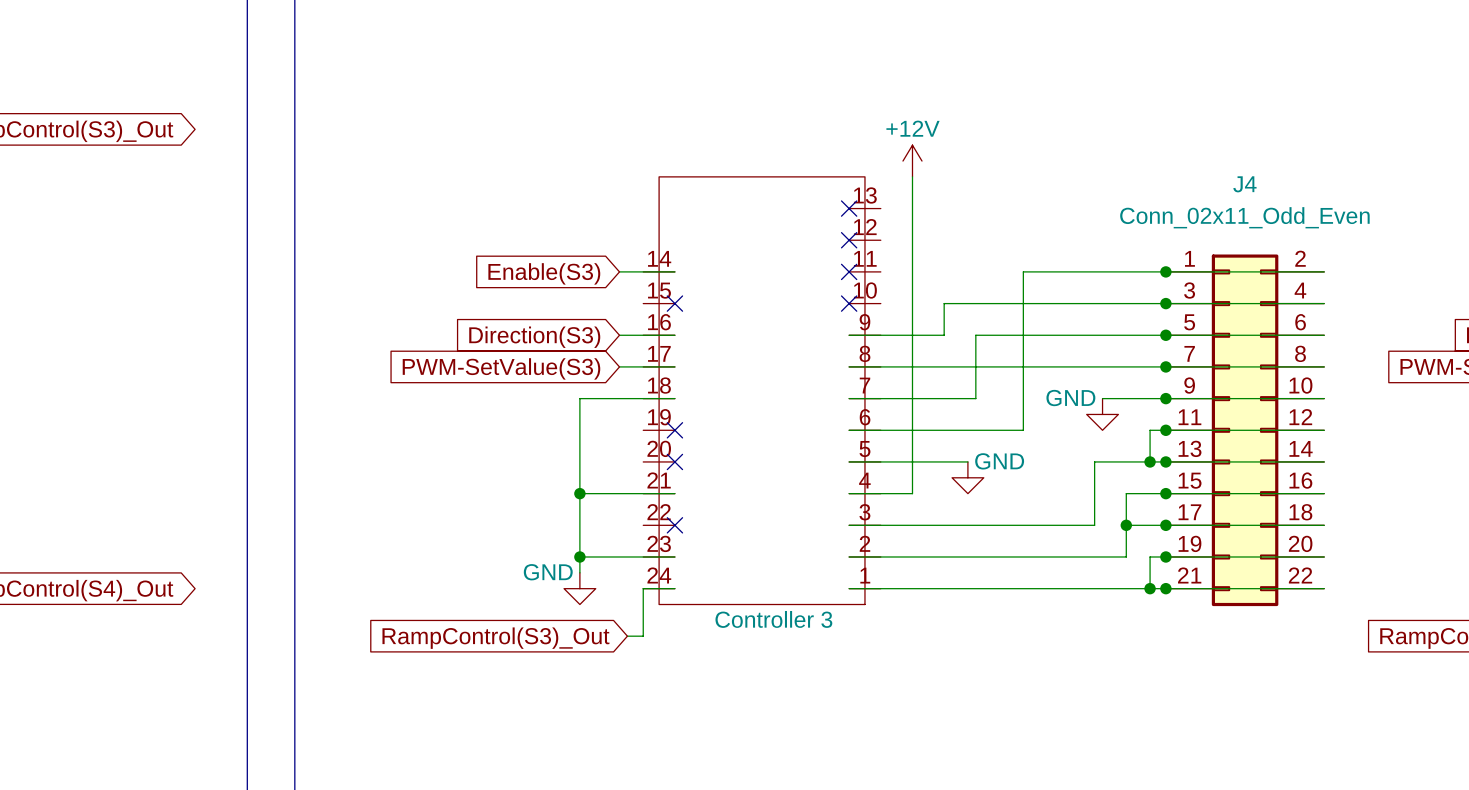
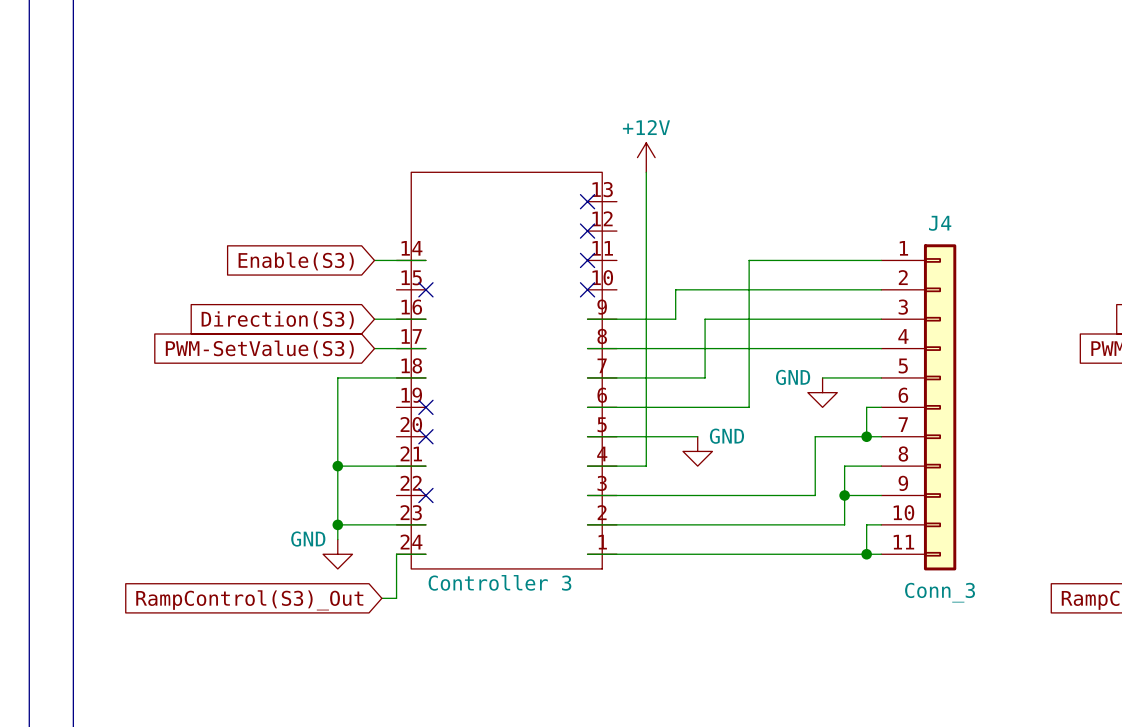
J4 name position: J4 (1244, 184) -> J4 (940, 223)
J4 value: Conn_02x11_Odd_Even (1244, 217) -> Conn_3 (940, 592)
J4 symbol: [1165, 254, 1325, 607] -> [881, 244, 957, 571]
junction: (1165, 271) -> none
junction: (1165, 303) -> none
junction: (1165, 335) -> none
junction: (1165, 366) -> none
junction: (1165, 398) -> none
junction: (1165, 430) -> none
junction: (1165, 461) -> none
junction: (1165, 493) -> none
junction: (1165, 525) -> none
junction: (1165, 556) -> none
junction: (1165, 588) -> none

